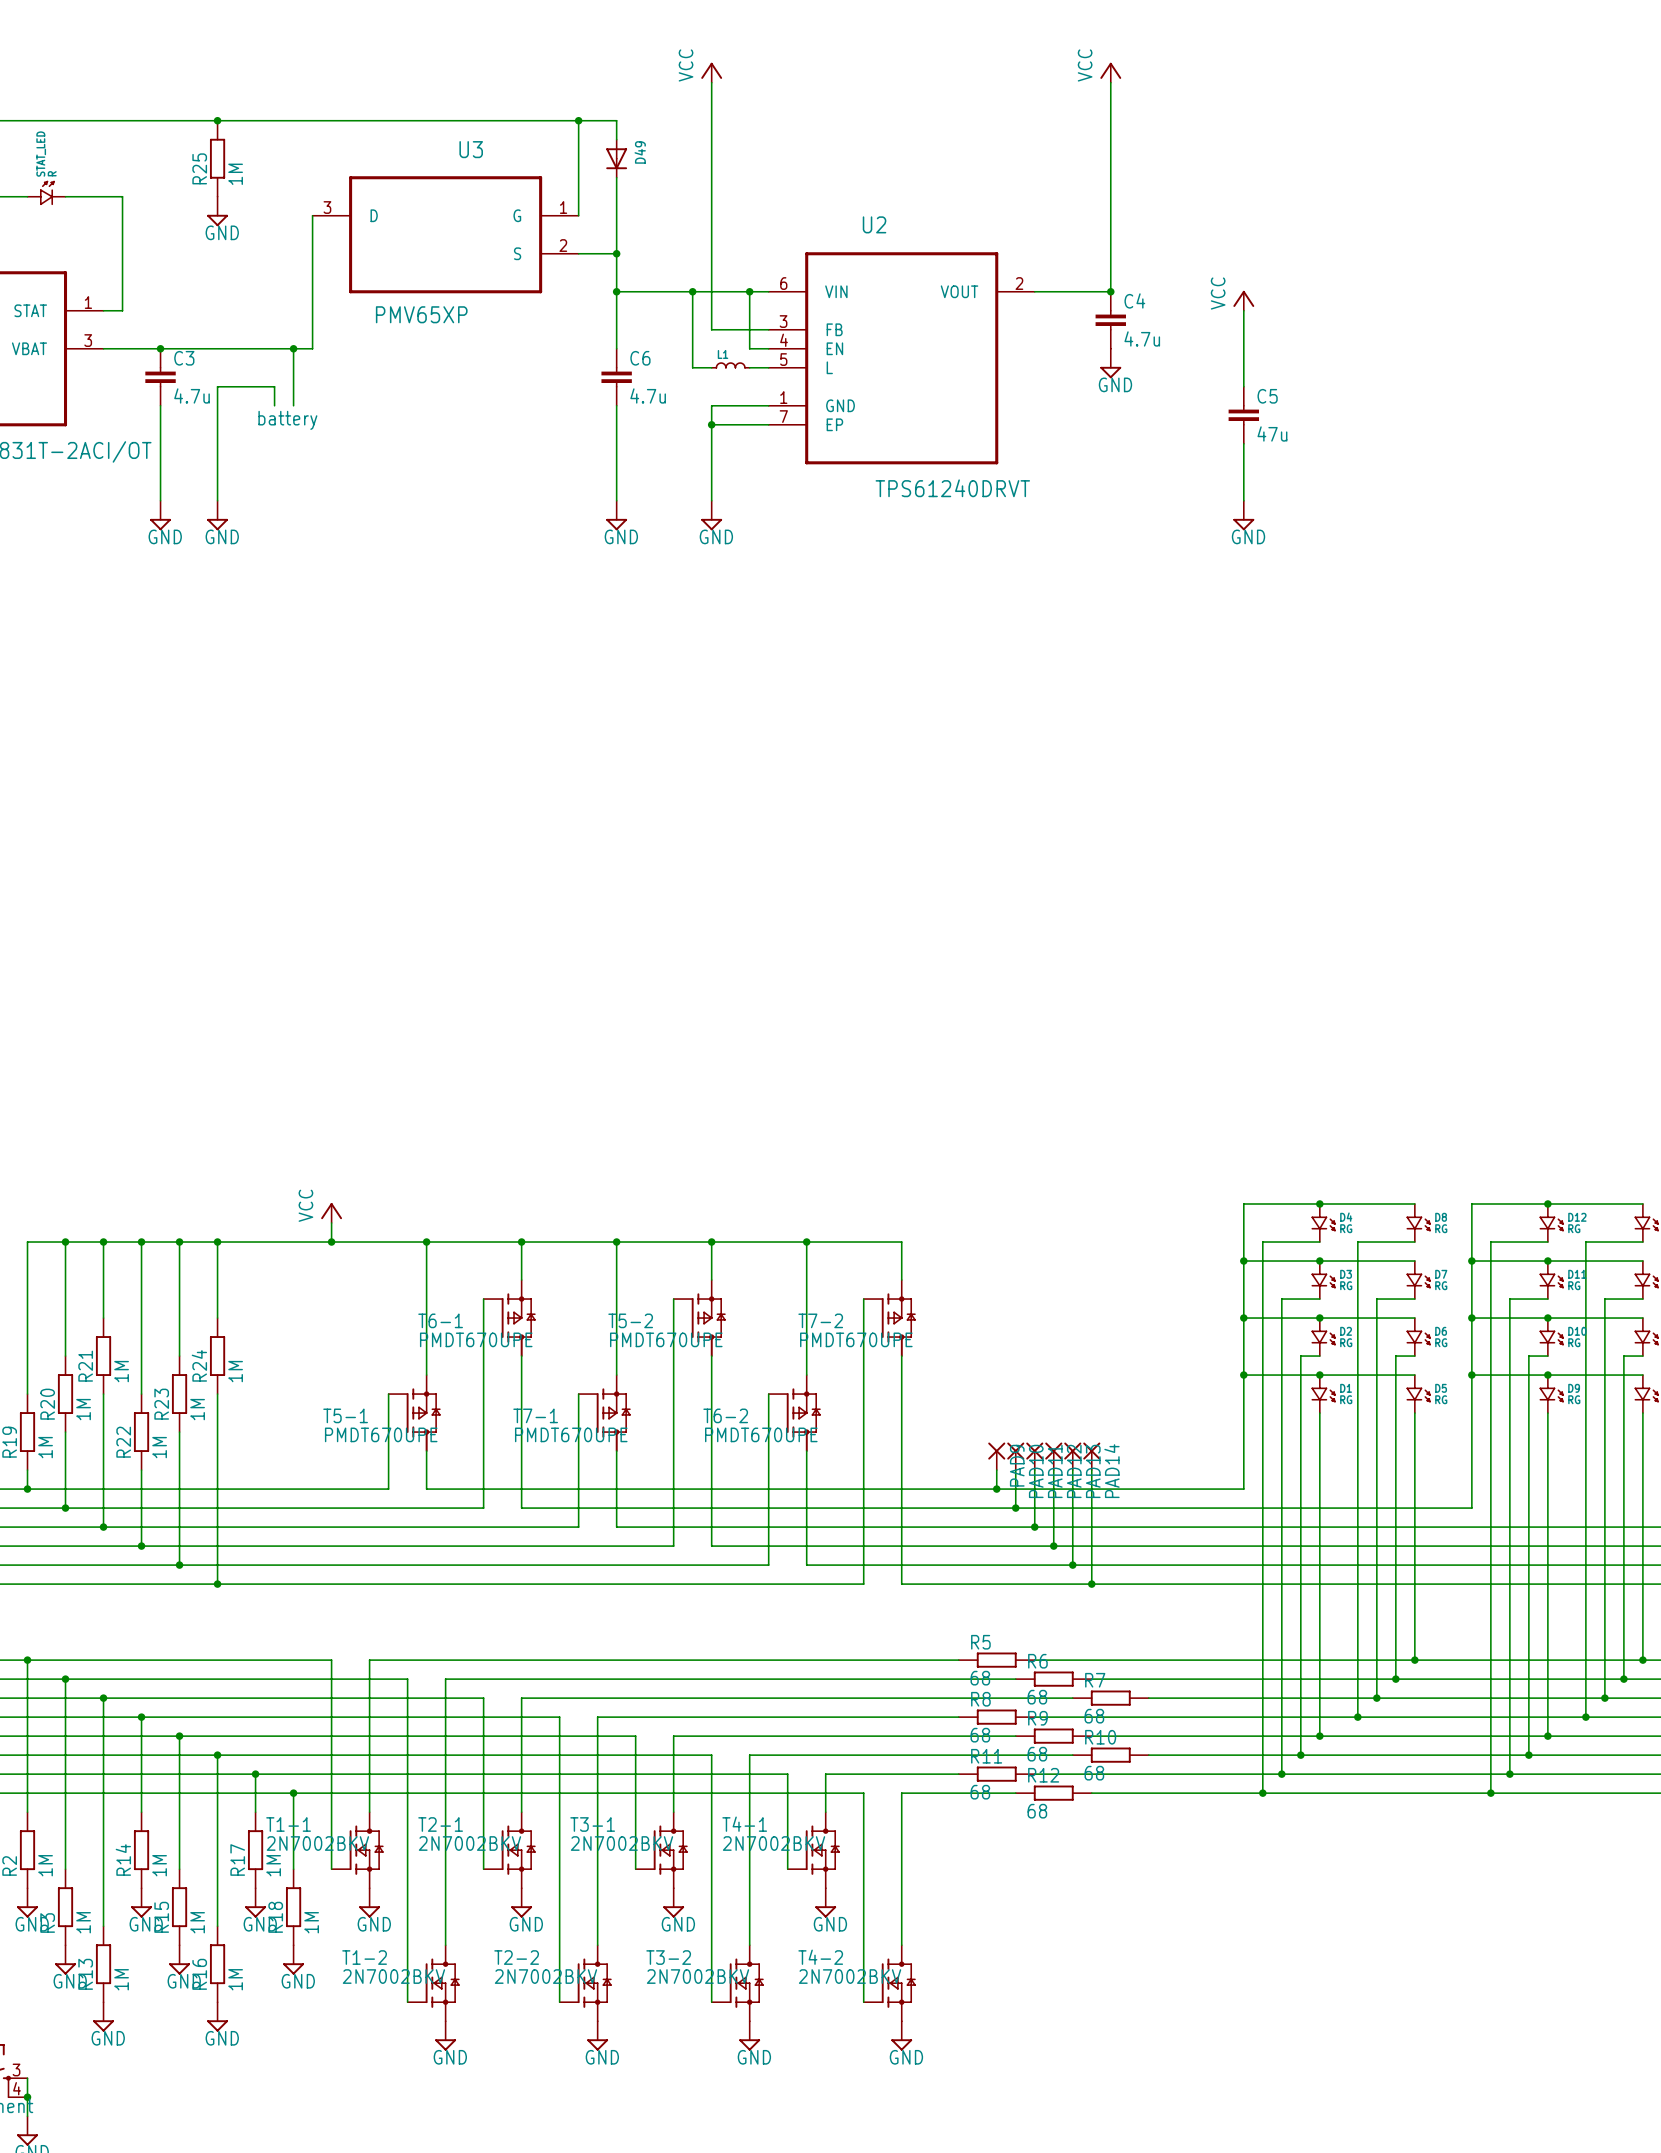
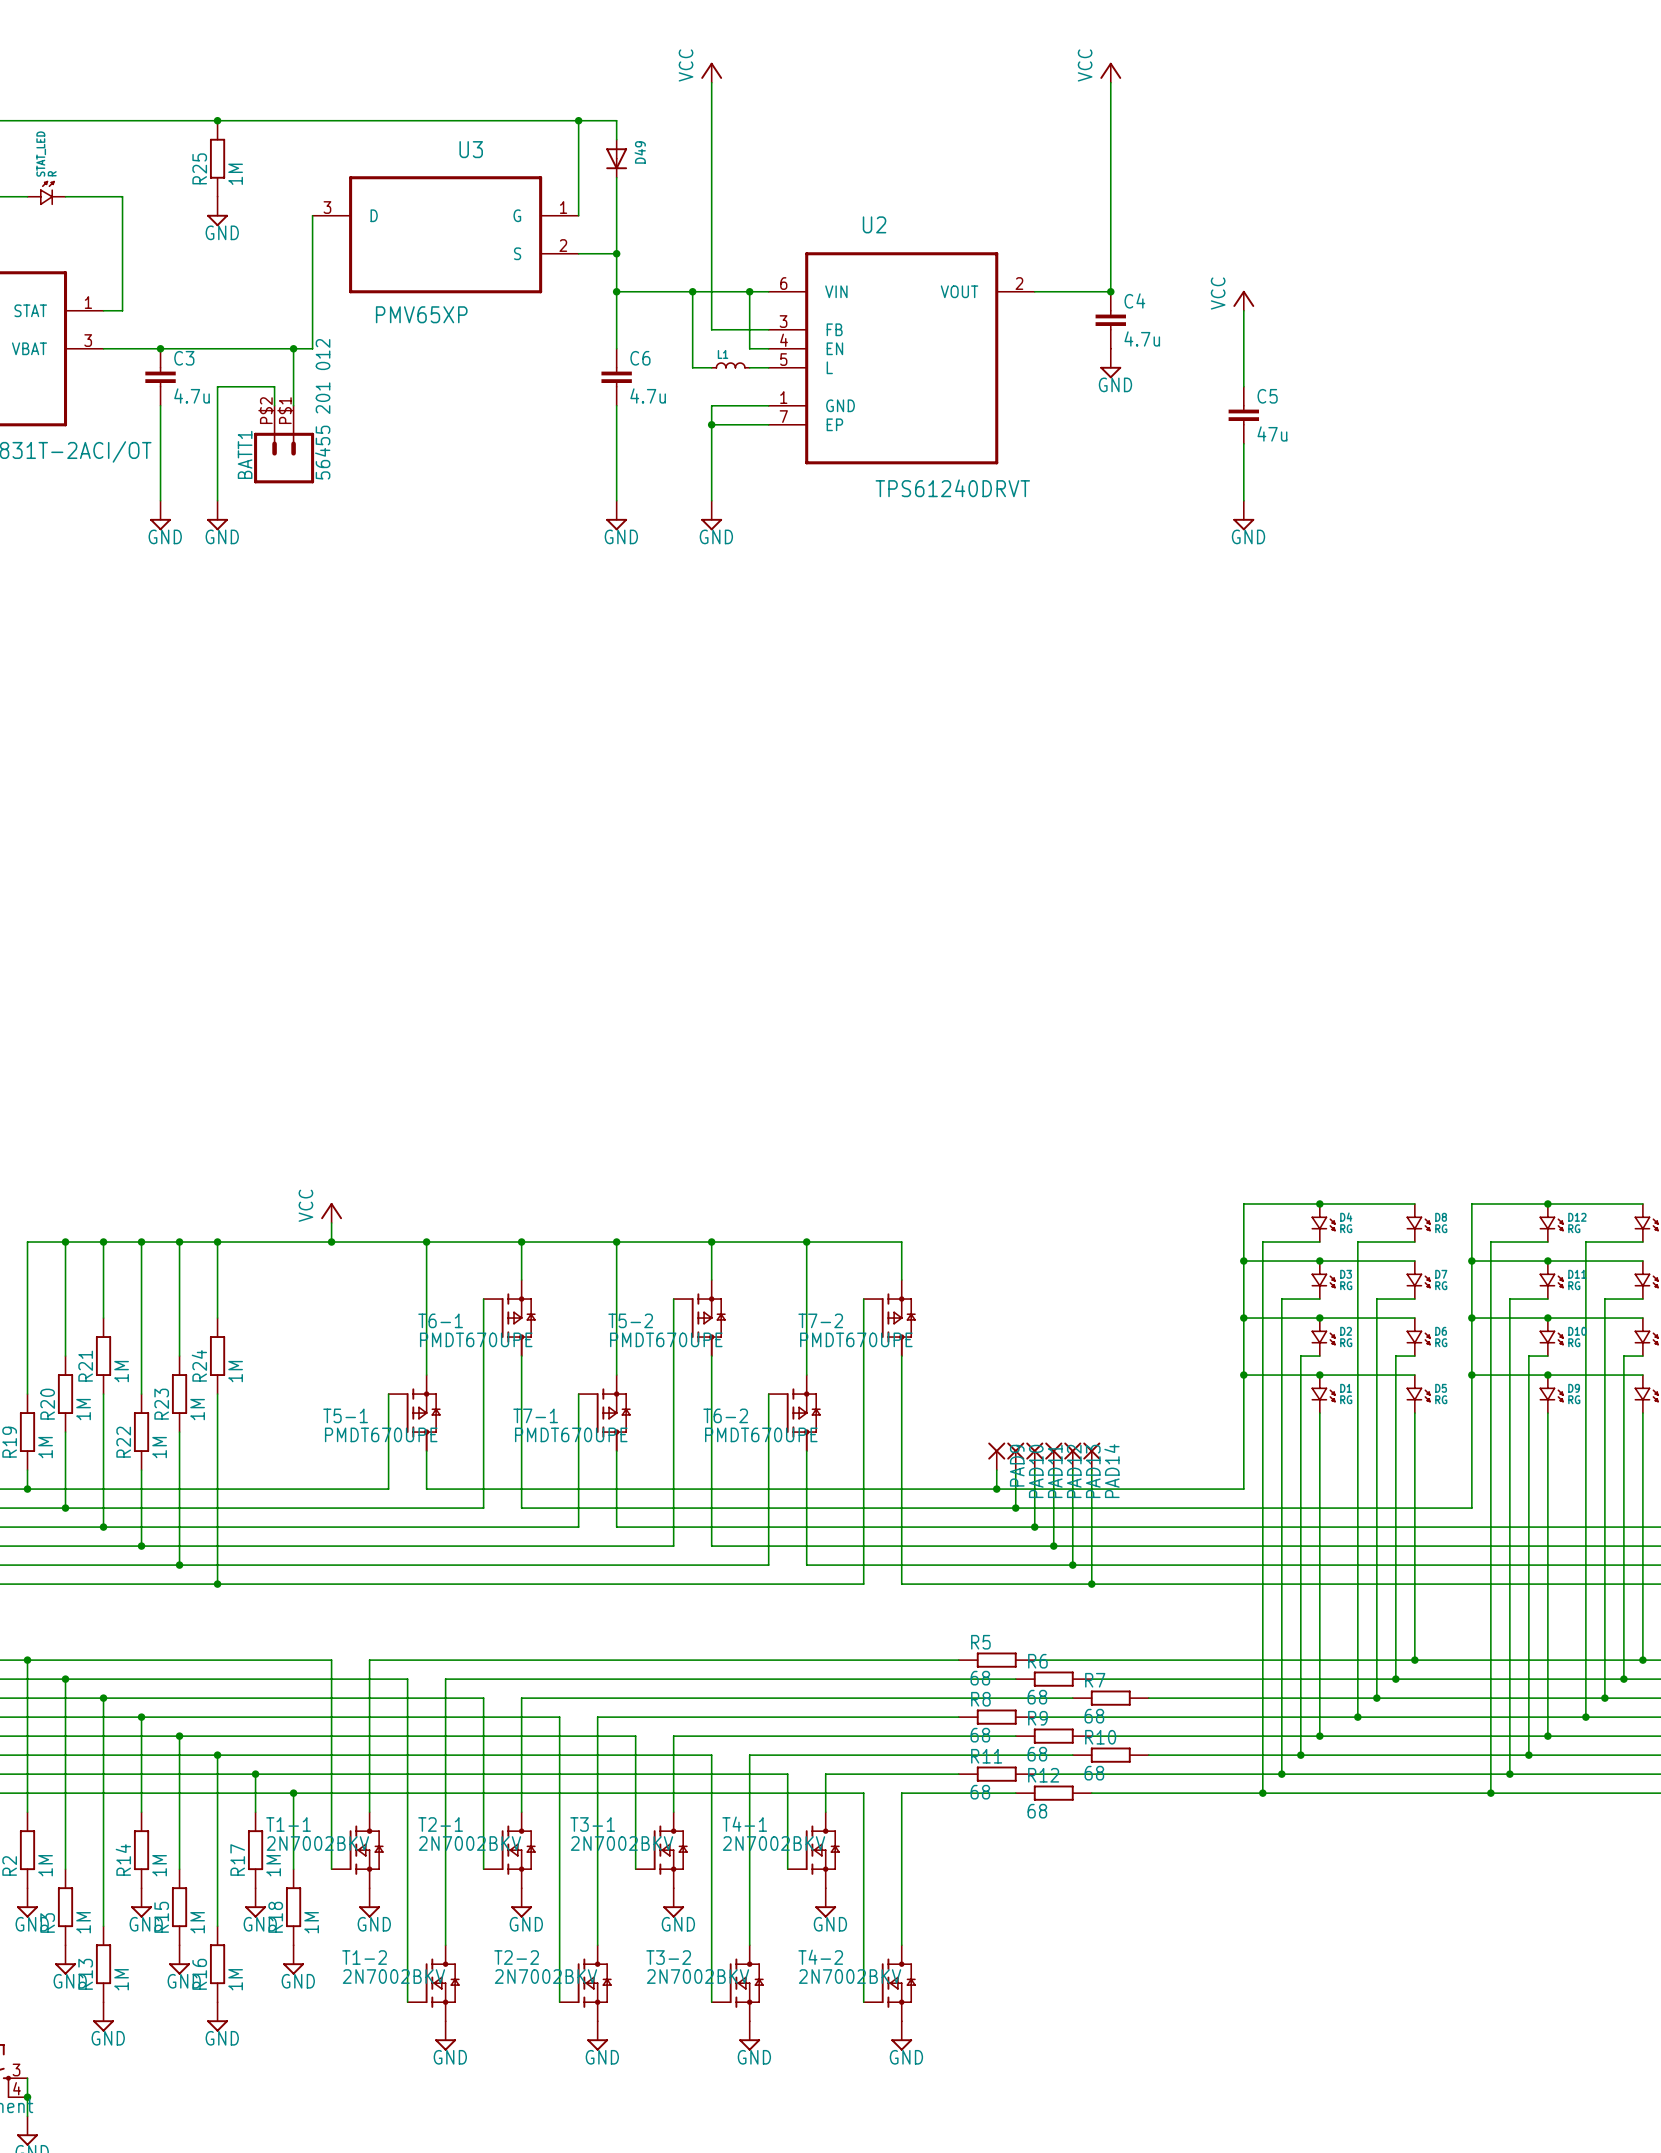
text: battery (287, 420) -> none
BATT1: none -> 56455 201 012 (284, 444)

